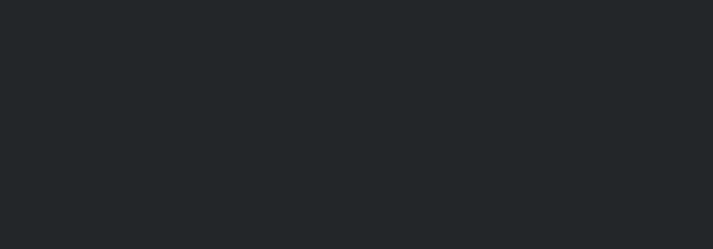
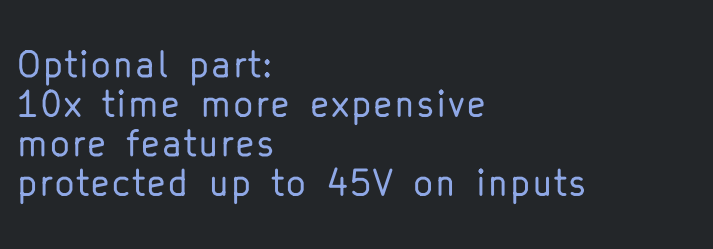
text: none -> Optional part: (144, 67)
text: none -> 10x time more expensive (251, 107)
text: none -> more features (146, 142)
text: none -> protected up to 45V on inputs (302, 185)

